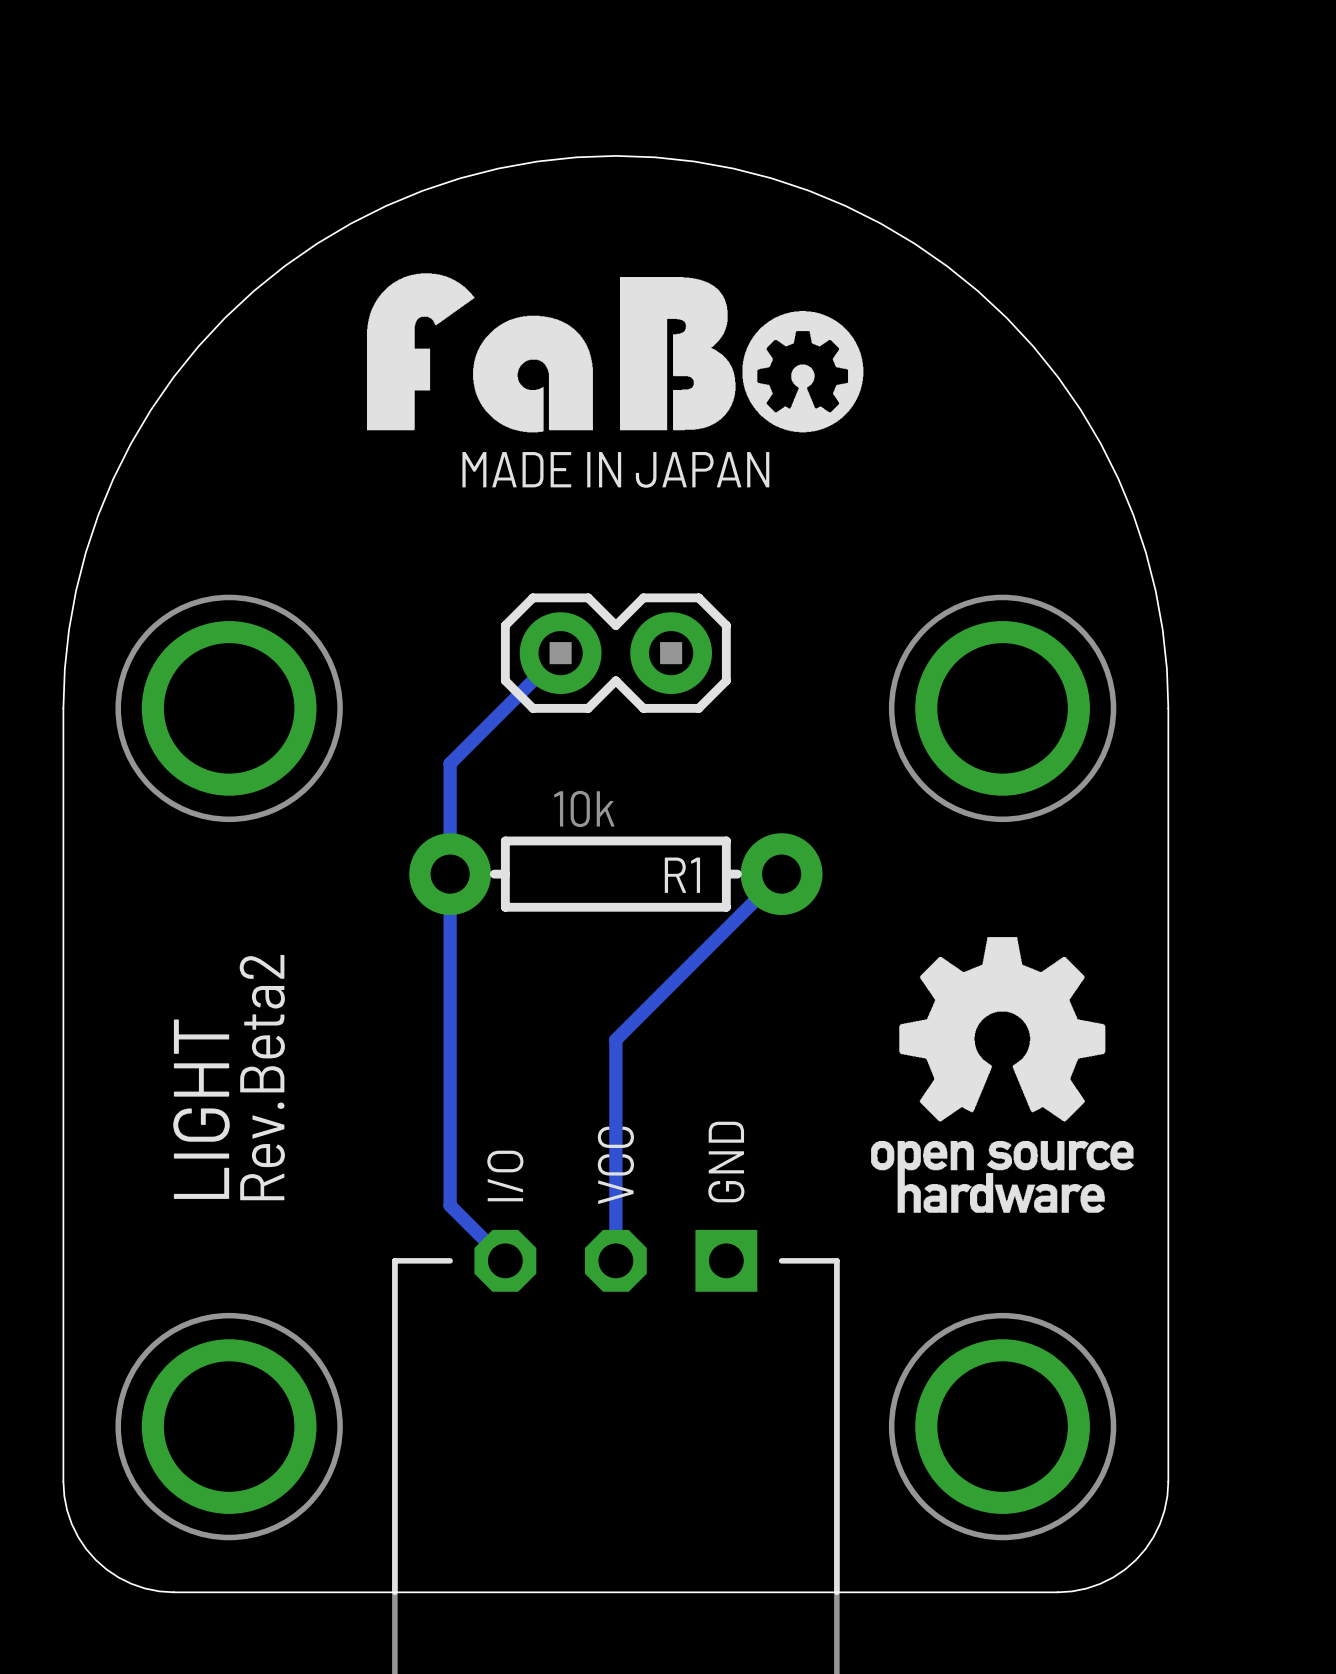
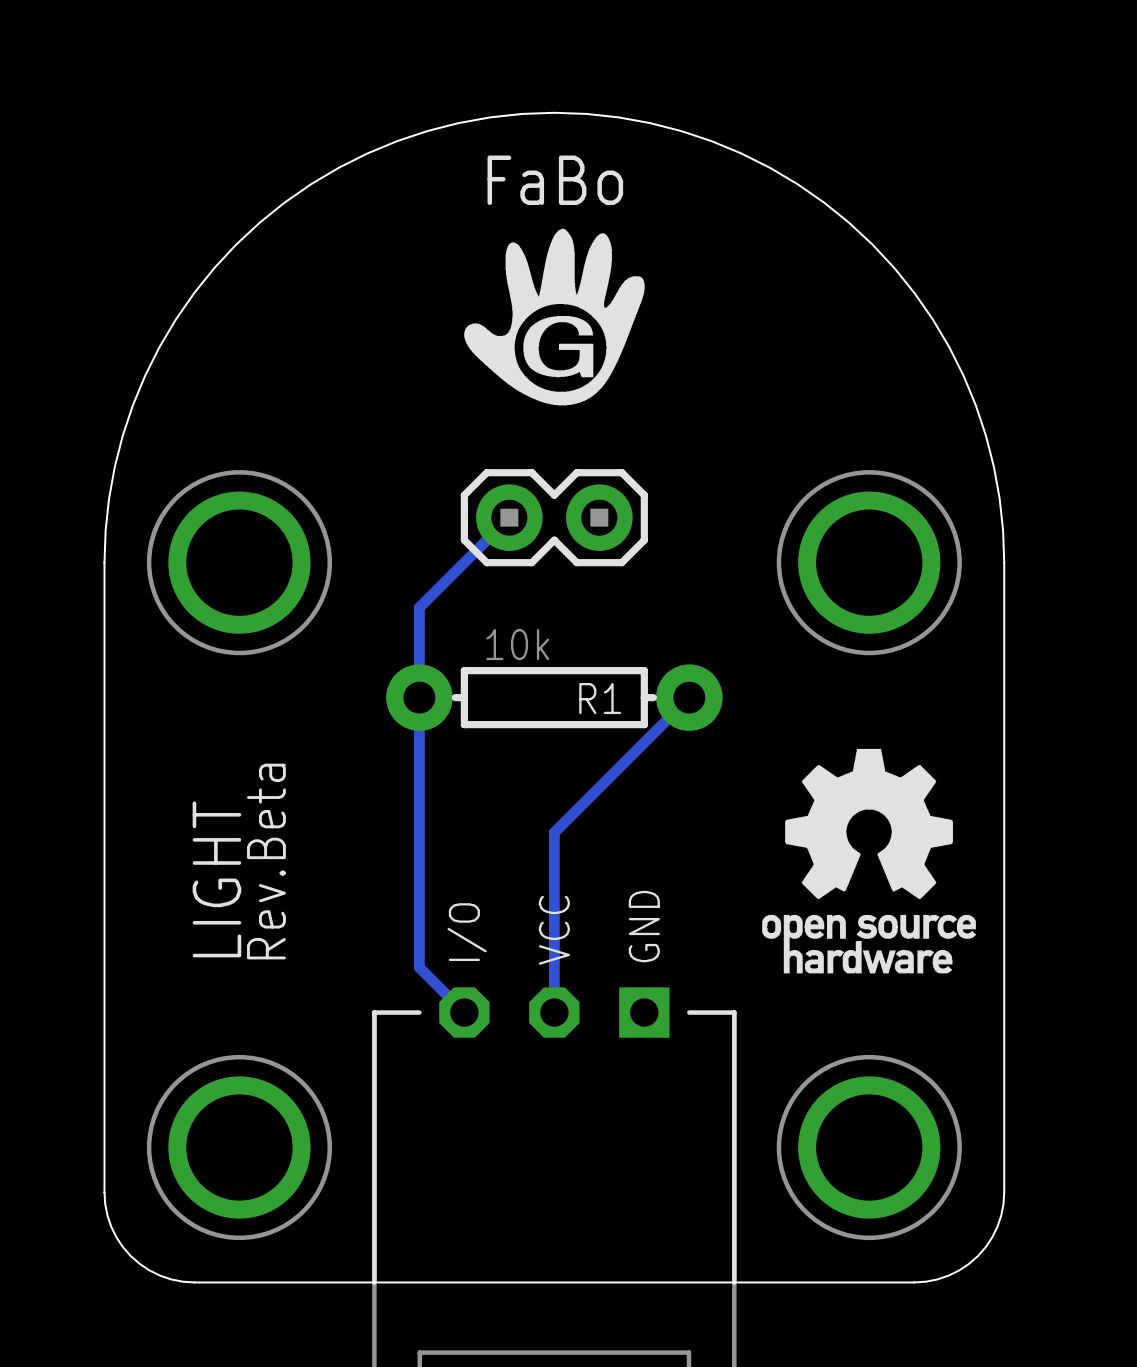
drawing: [366, 273, 864, 433] -> none
drawing: none -> [464, 228, 645, 406]
text: MADE IN JAPAN (615, 469) -> none
text: Rev.Beta2 (262, 1077) -> Rev.Beta (266, 861)

